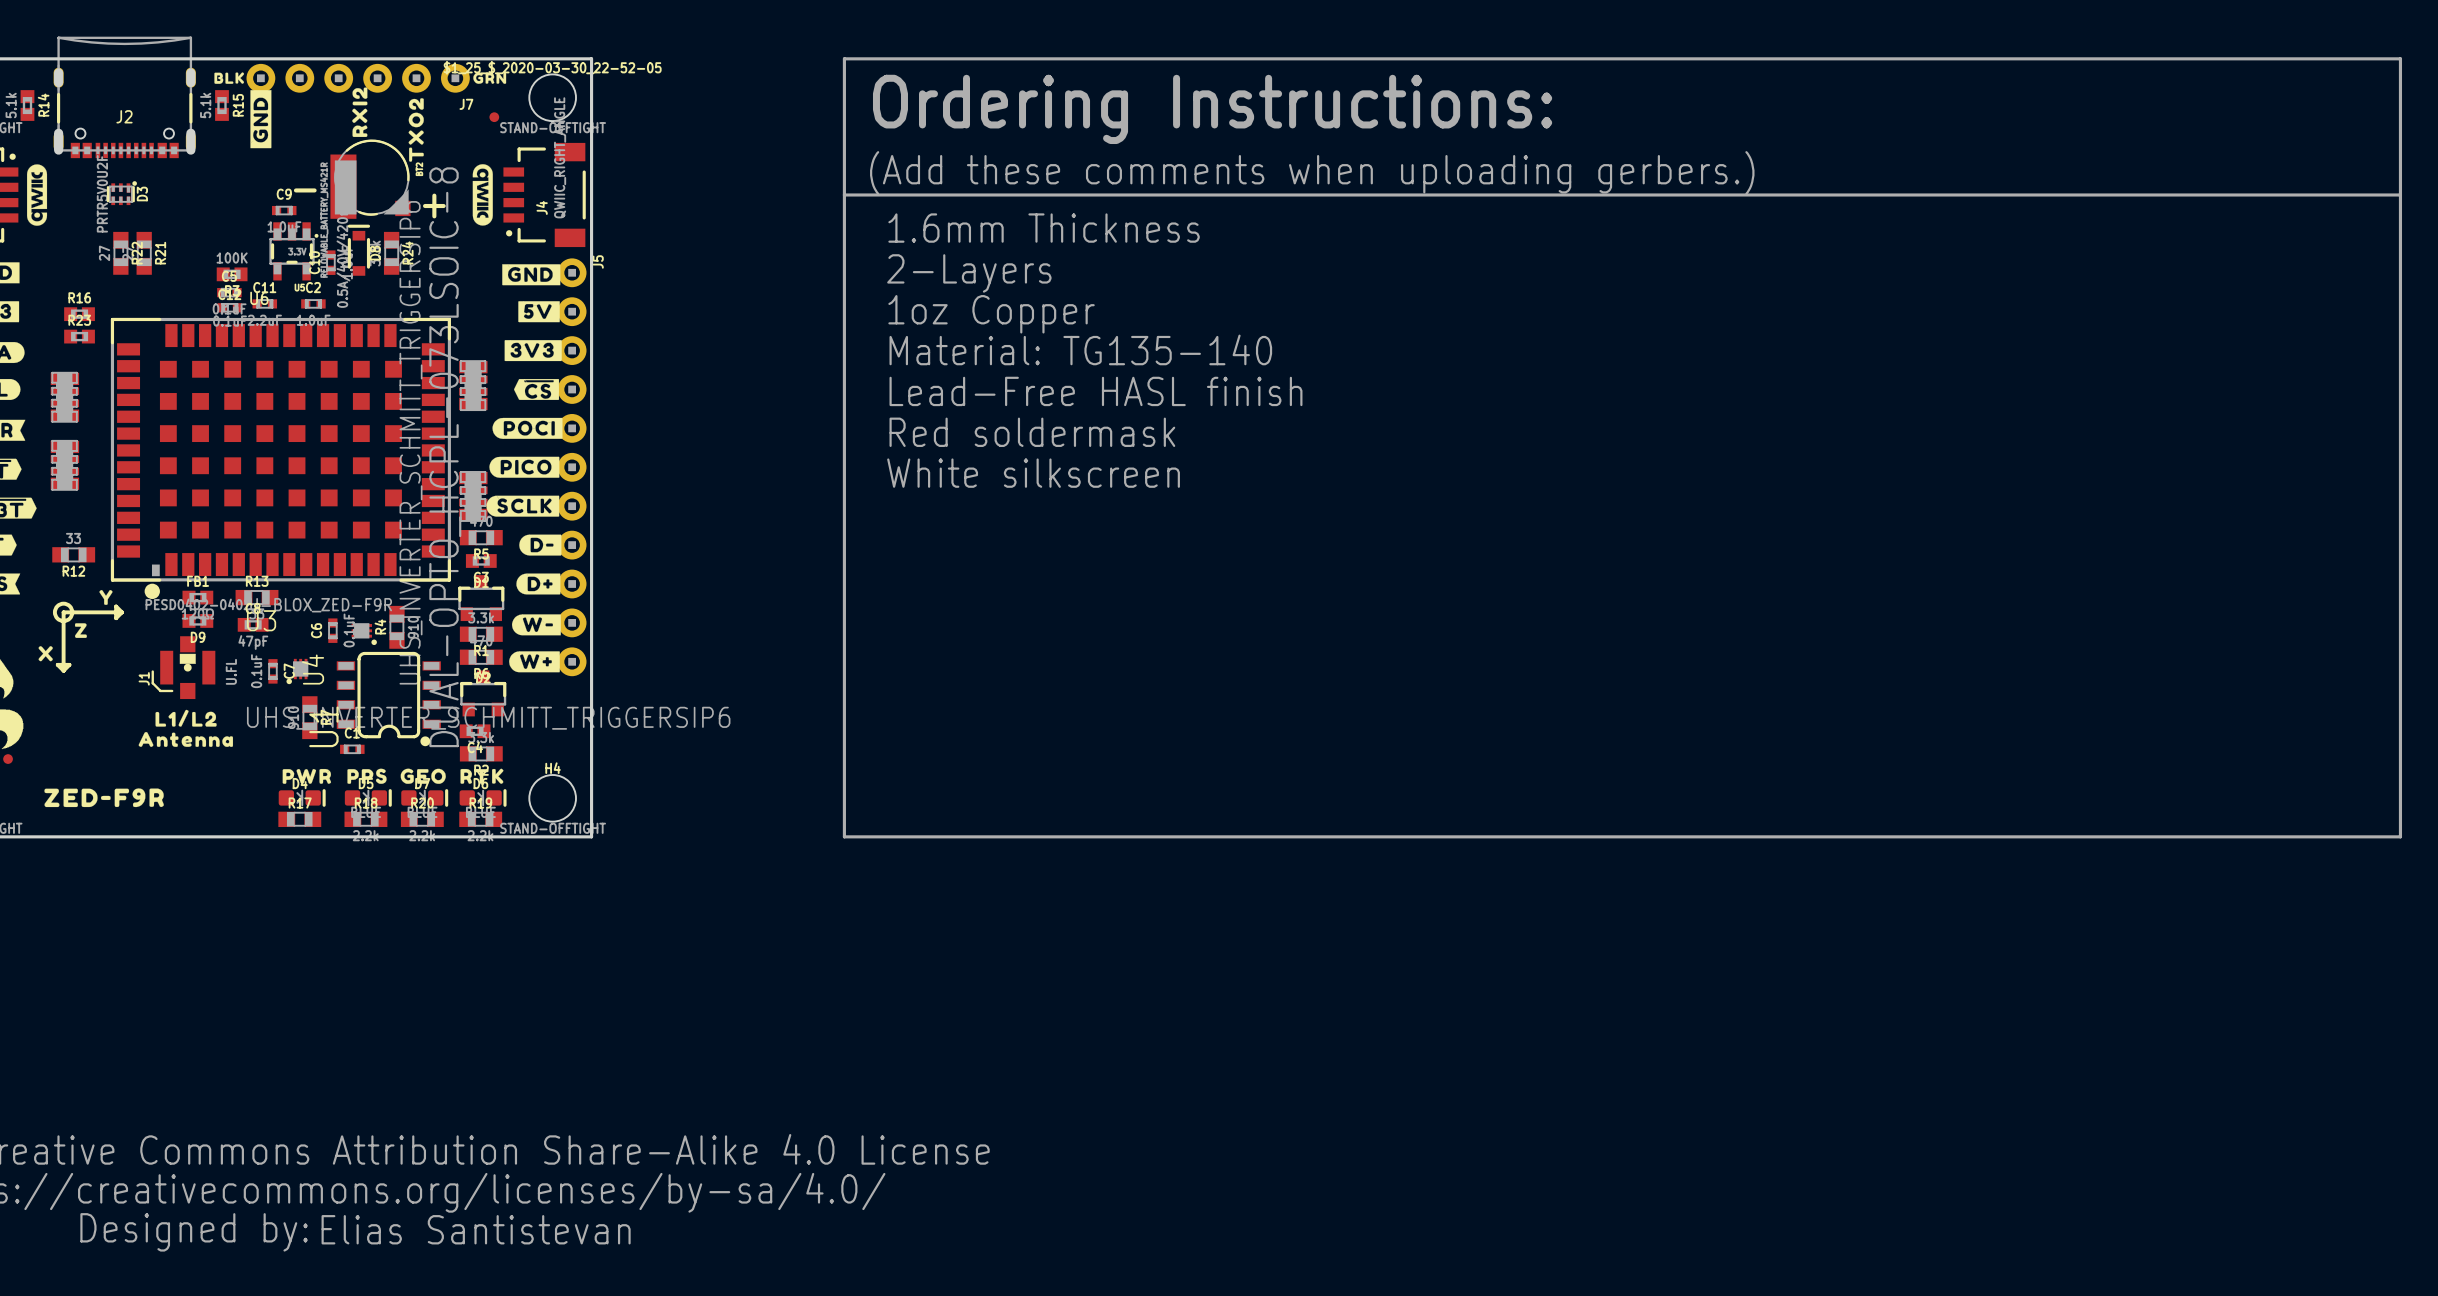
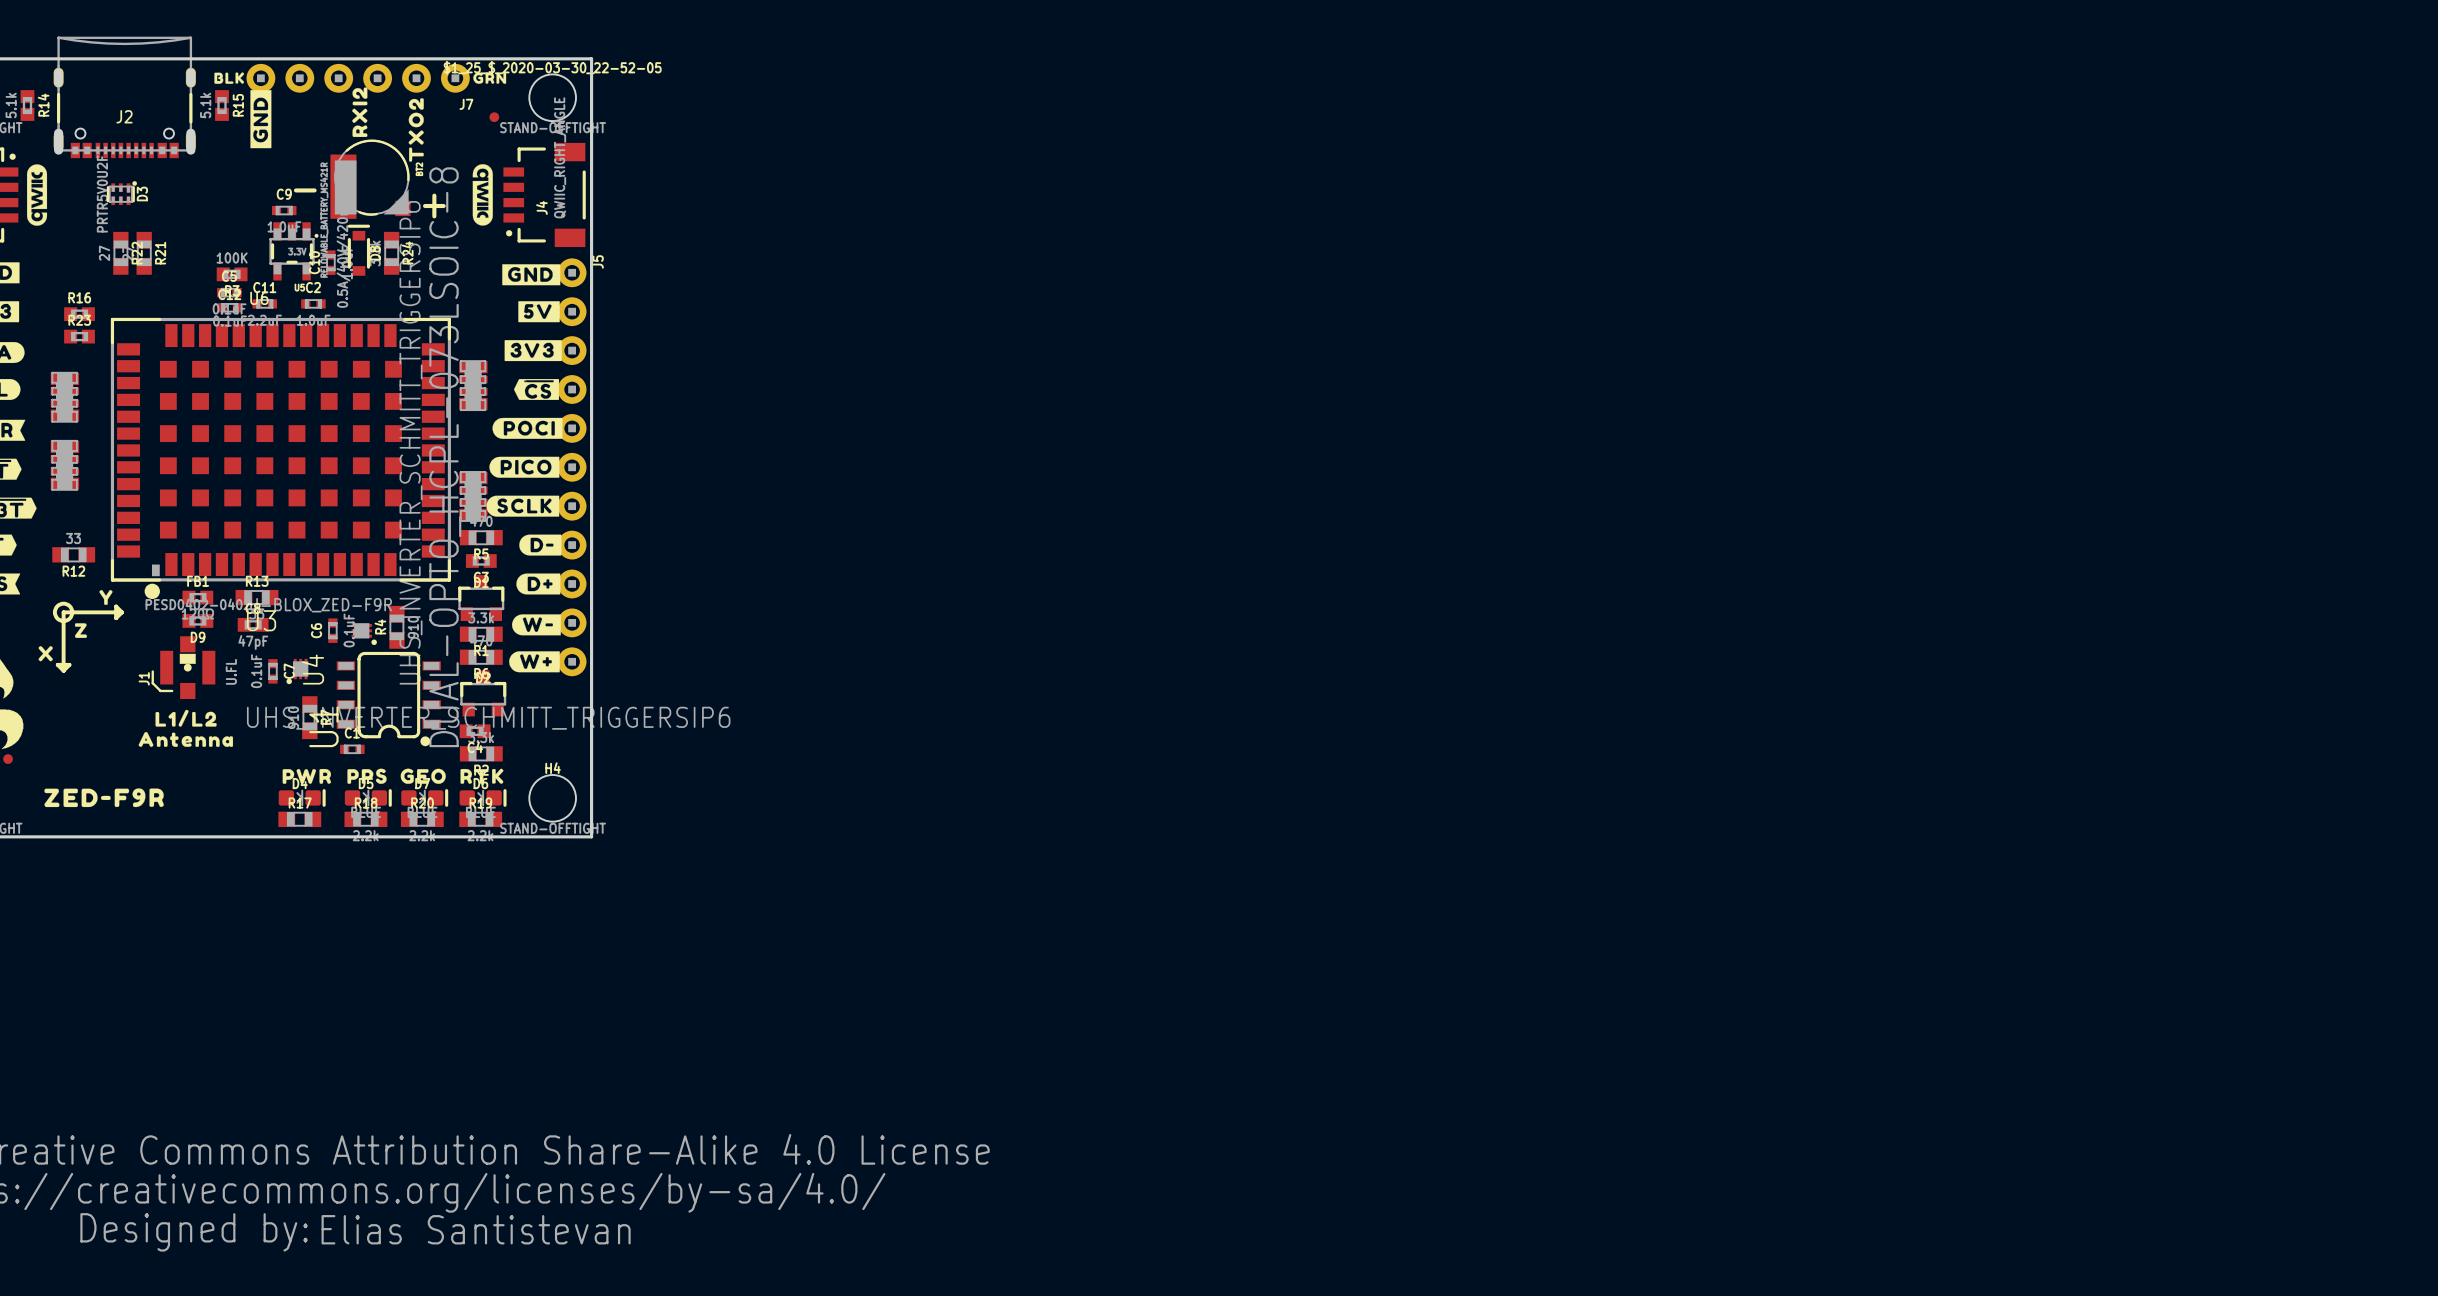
drawing: [842, 57, 2403, 839] -> none
text: 1.6mm Thickness (1044, 228) -> none
text: 2-Layers (969, 273) -> none
text: 1oz Copper (991, 314) -> none
text: Material: TG135-140 (1080, 349) -> none
text: Lead-Free HASL finish (1095, 391) -> none
text: Red soldermask (1032, 432) -> none
text: White silkscreen (1033, 473) -> none

